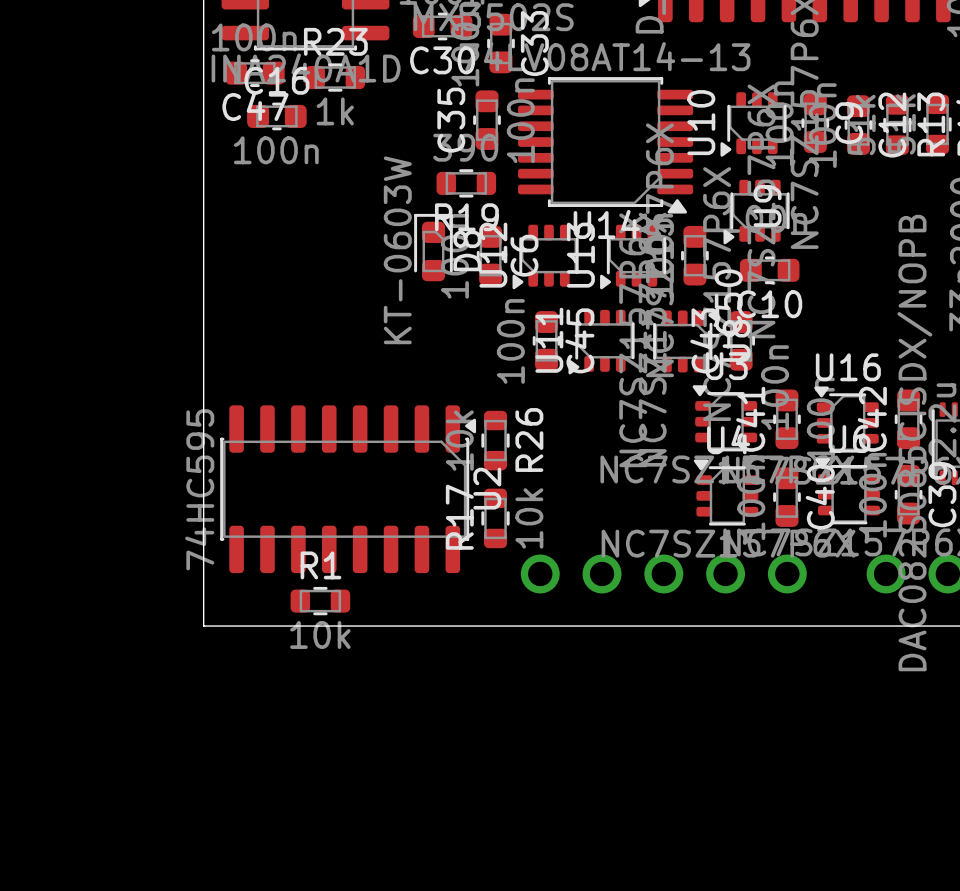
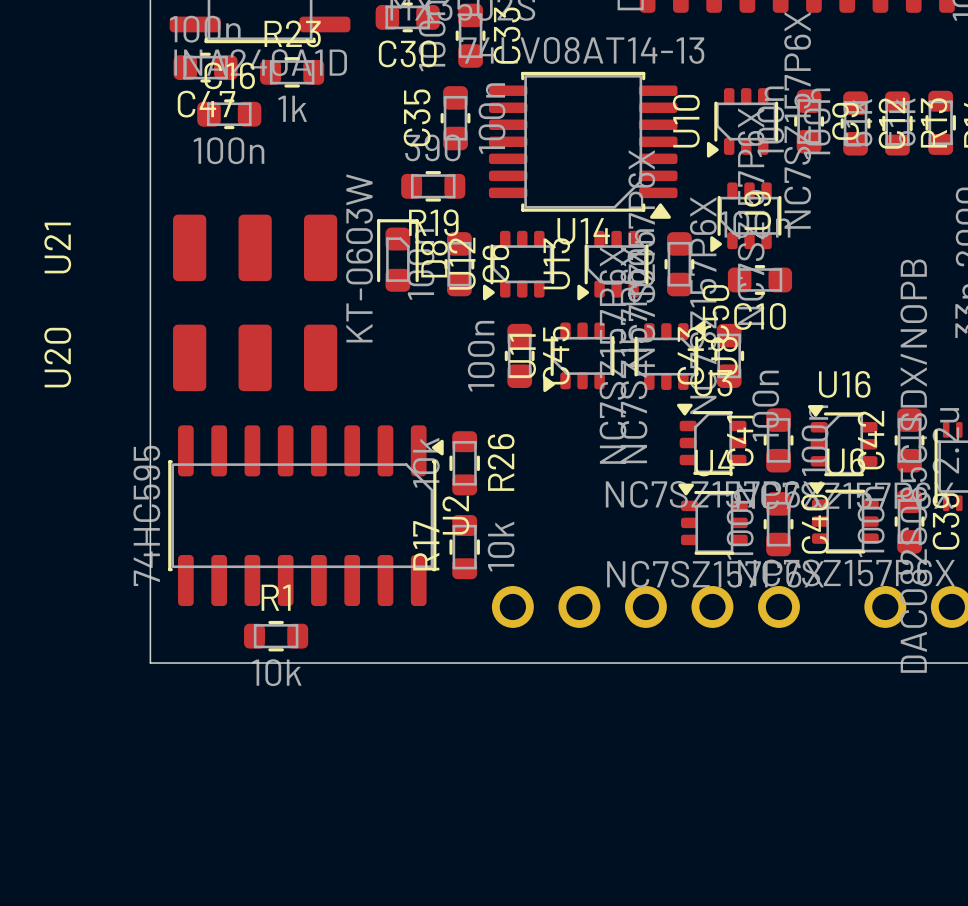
U21: none -> (255, 247)
U20: none -> (255, 357)

